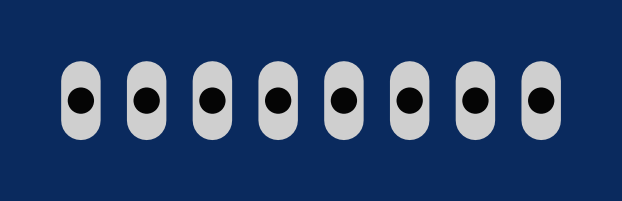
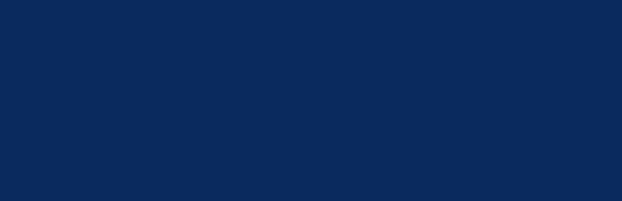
part: (311, 100) -> none

